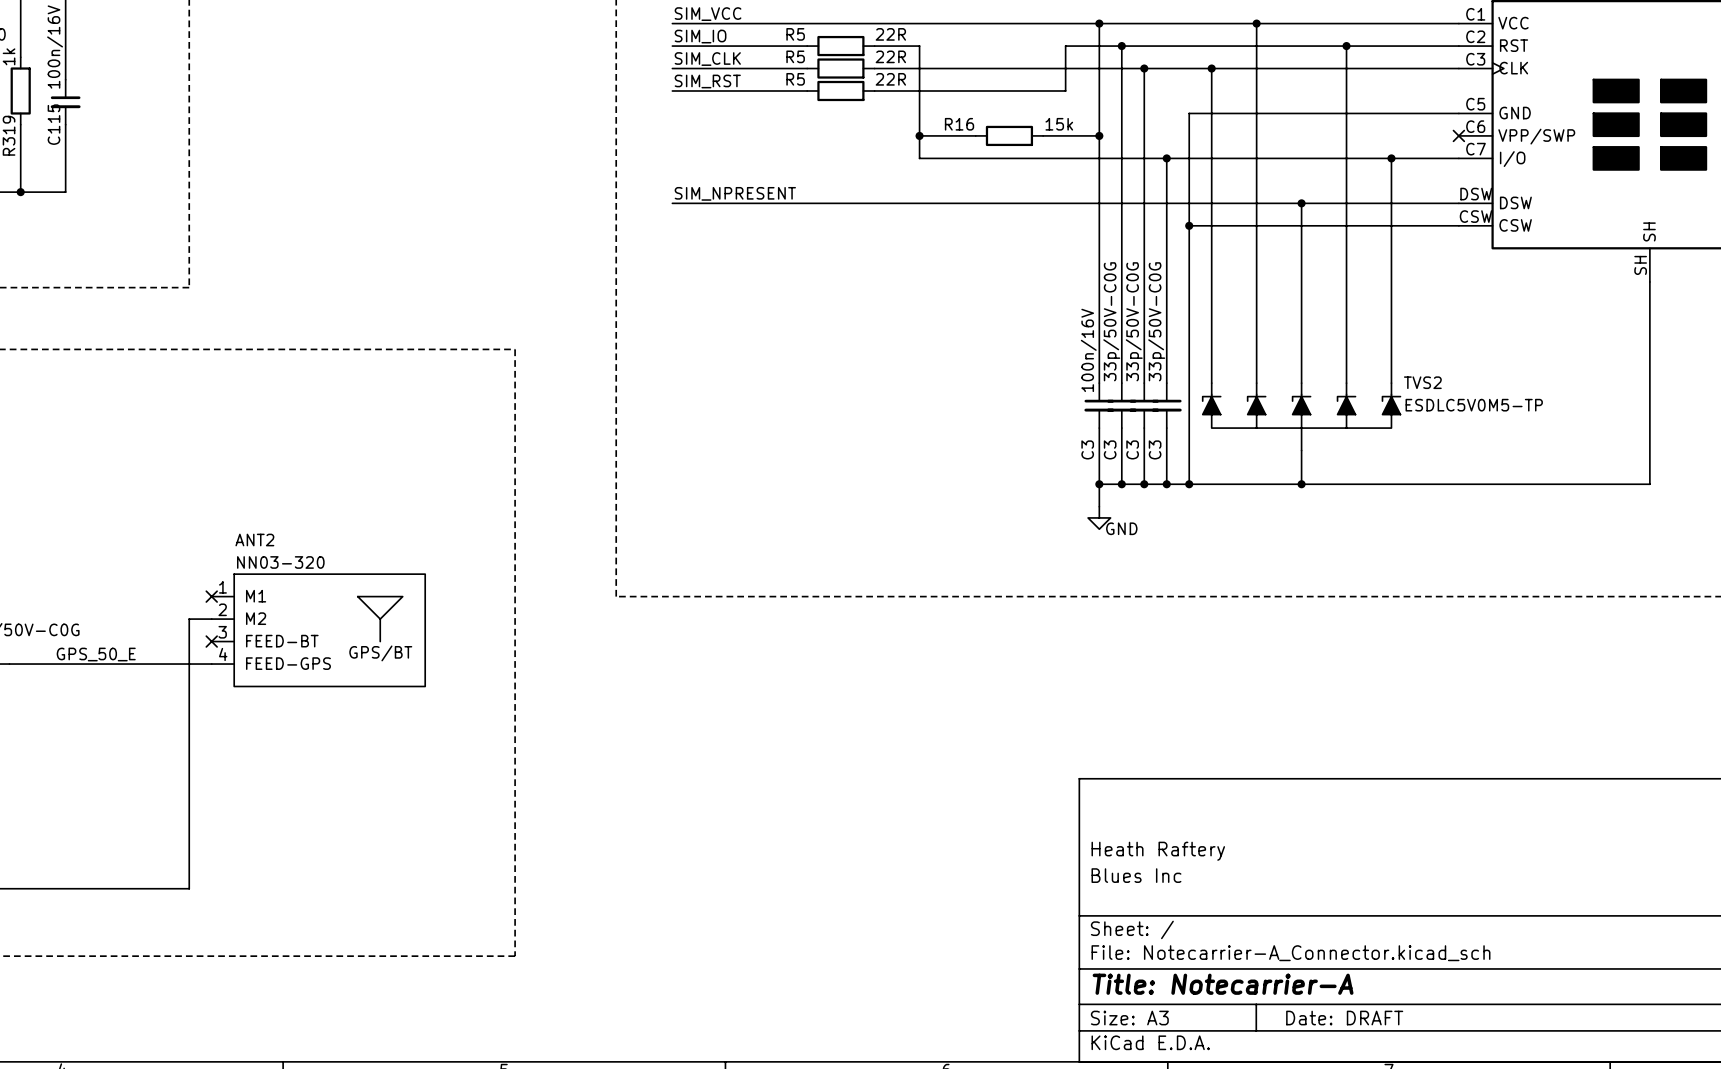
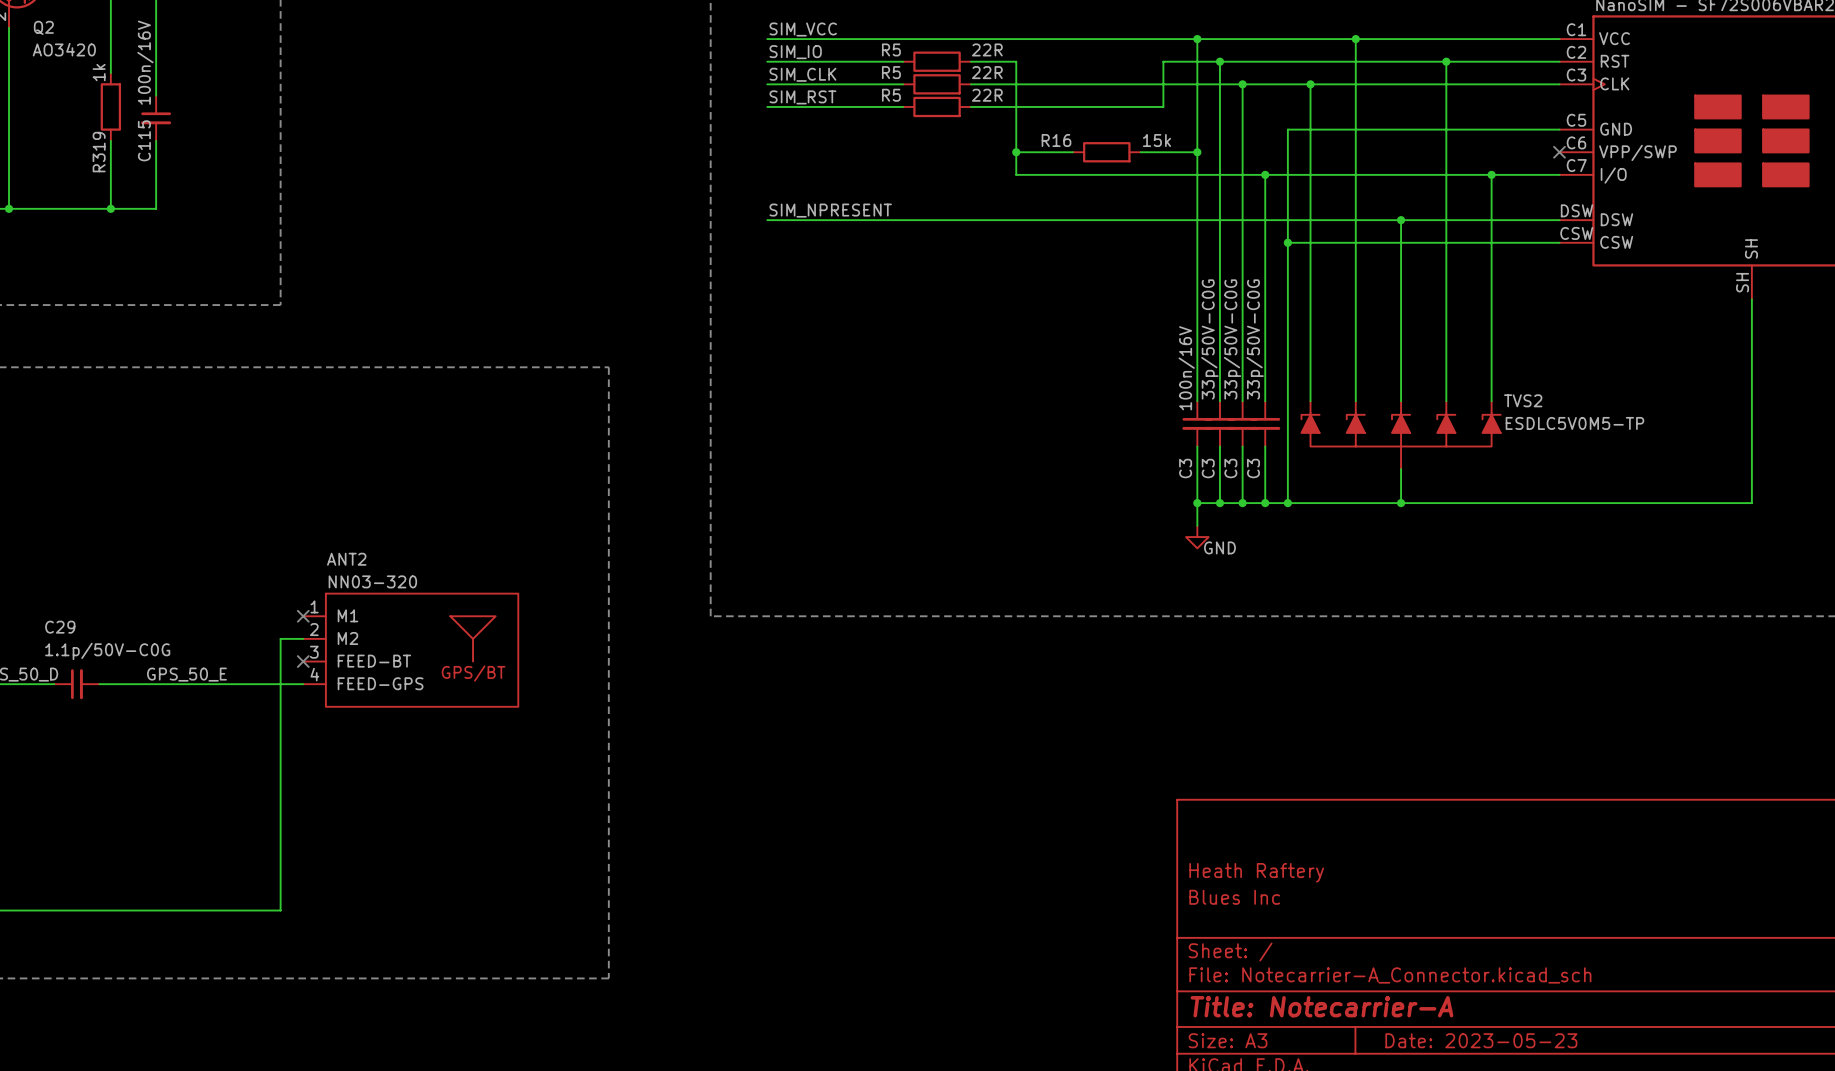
title block: Date: DRAFT (1344, 1018) -> Date: 2023-05-23 (1481, 1040)

